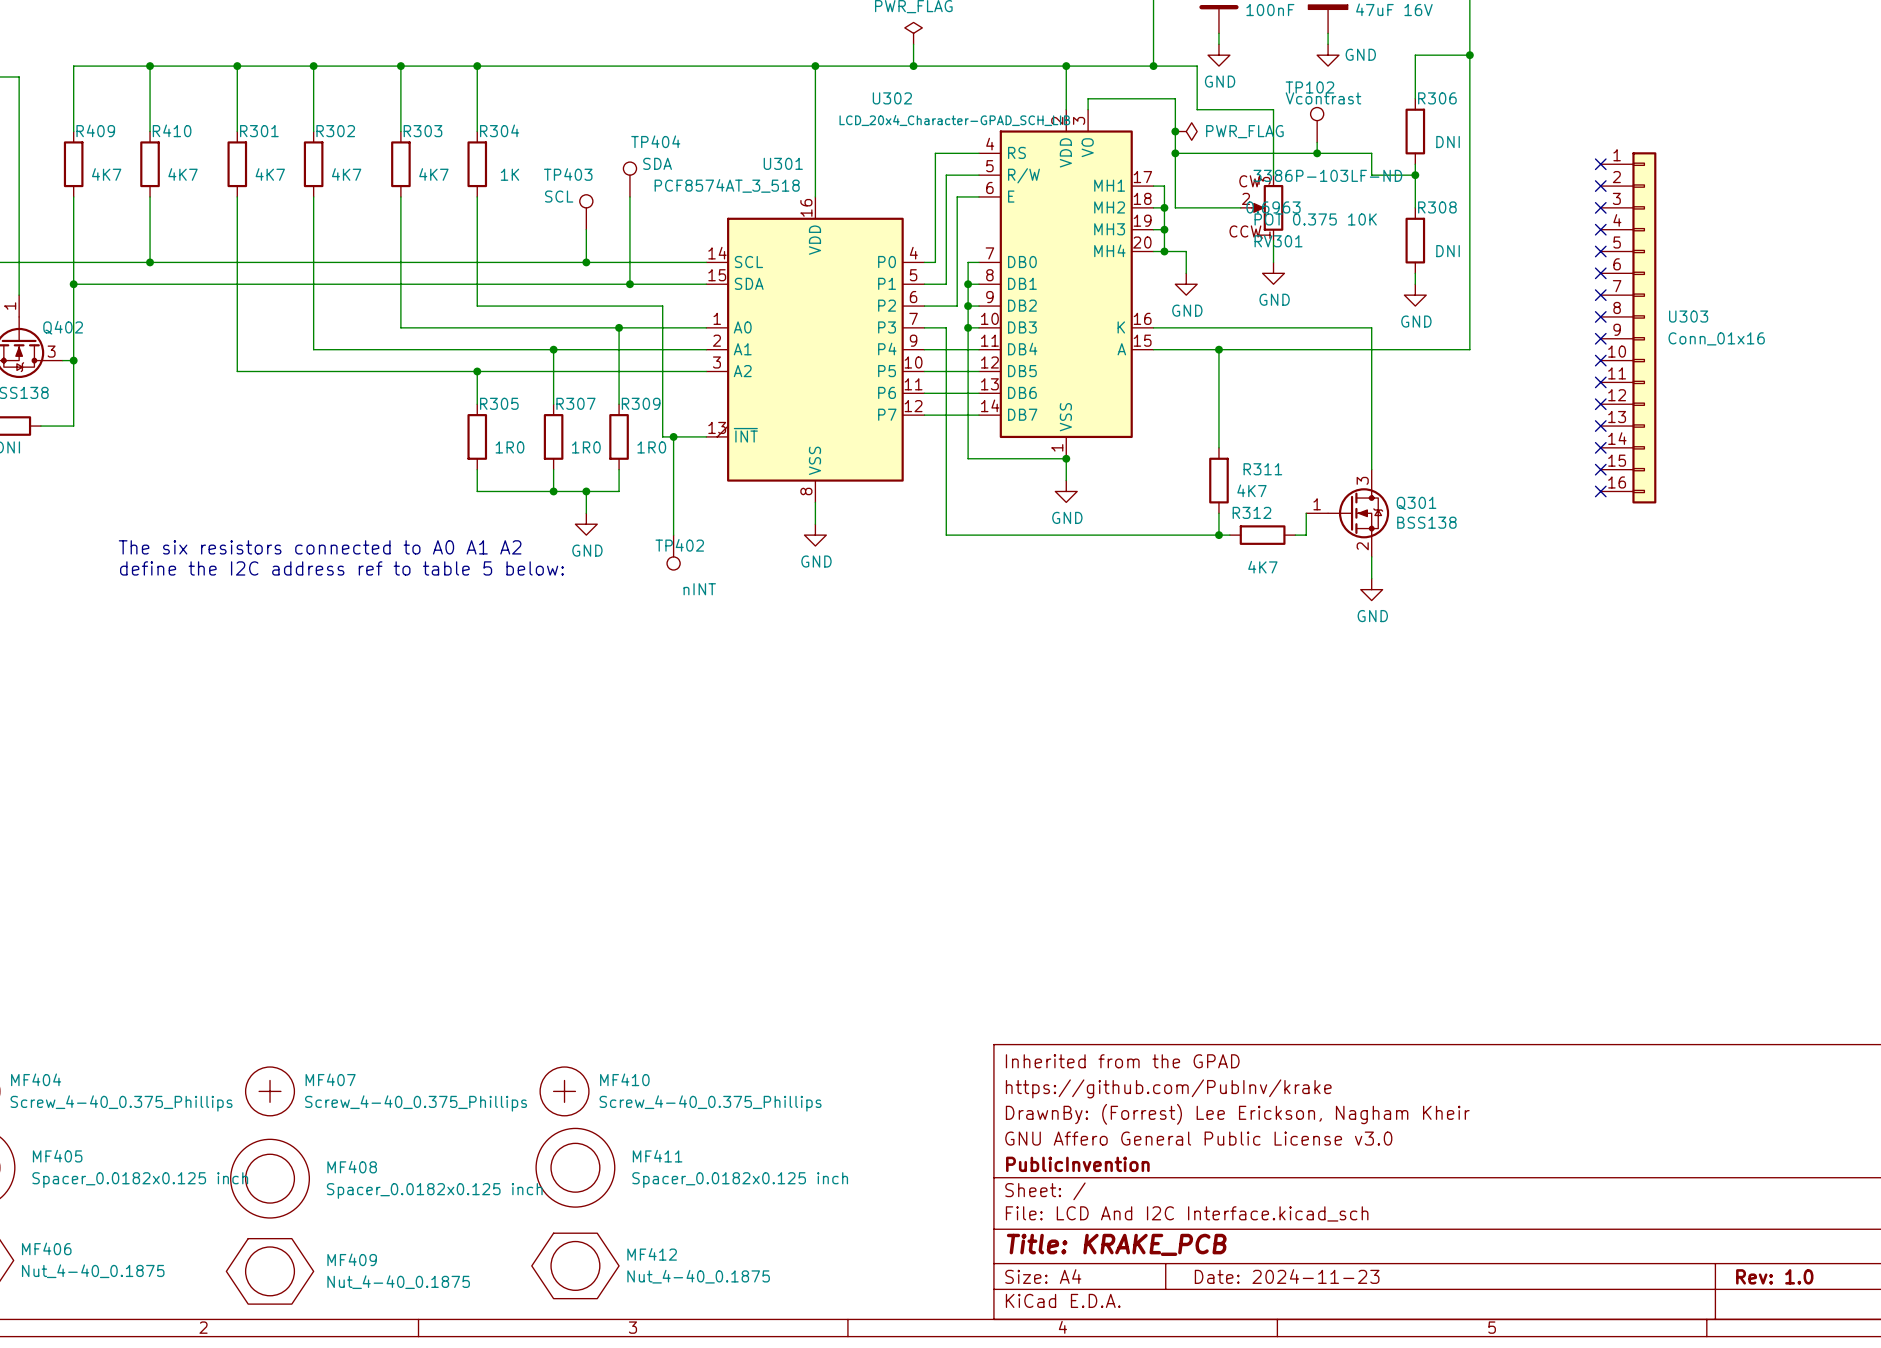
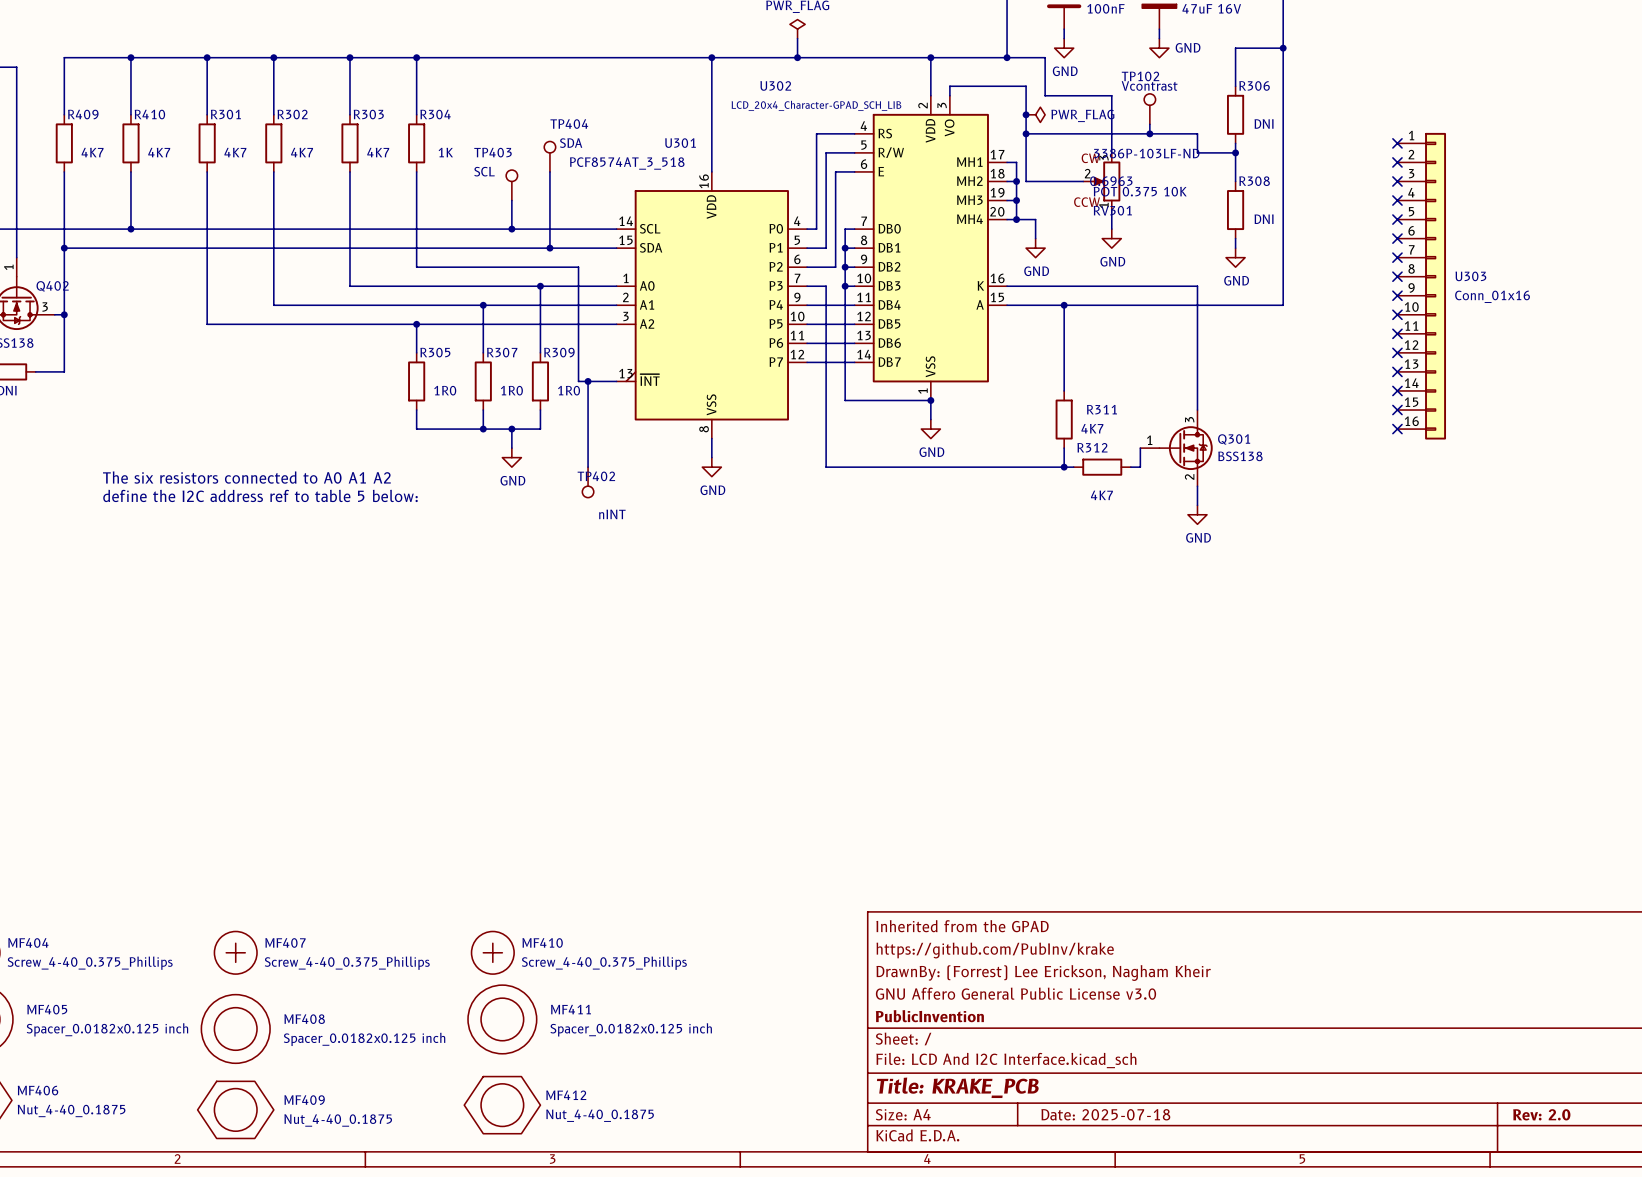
title block: Date: 2024-11-23 (1287, 1276) -> Date: 2025-07-18 (1105, 1114)
title block: Rev: 1.0 (1774, 1276) -> Rev: 2.0 (1541, 1114)

